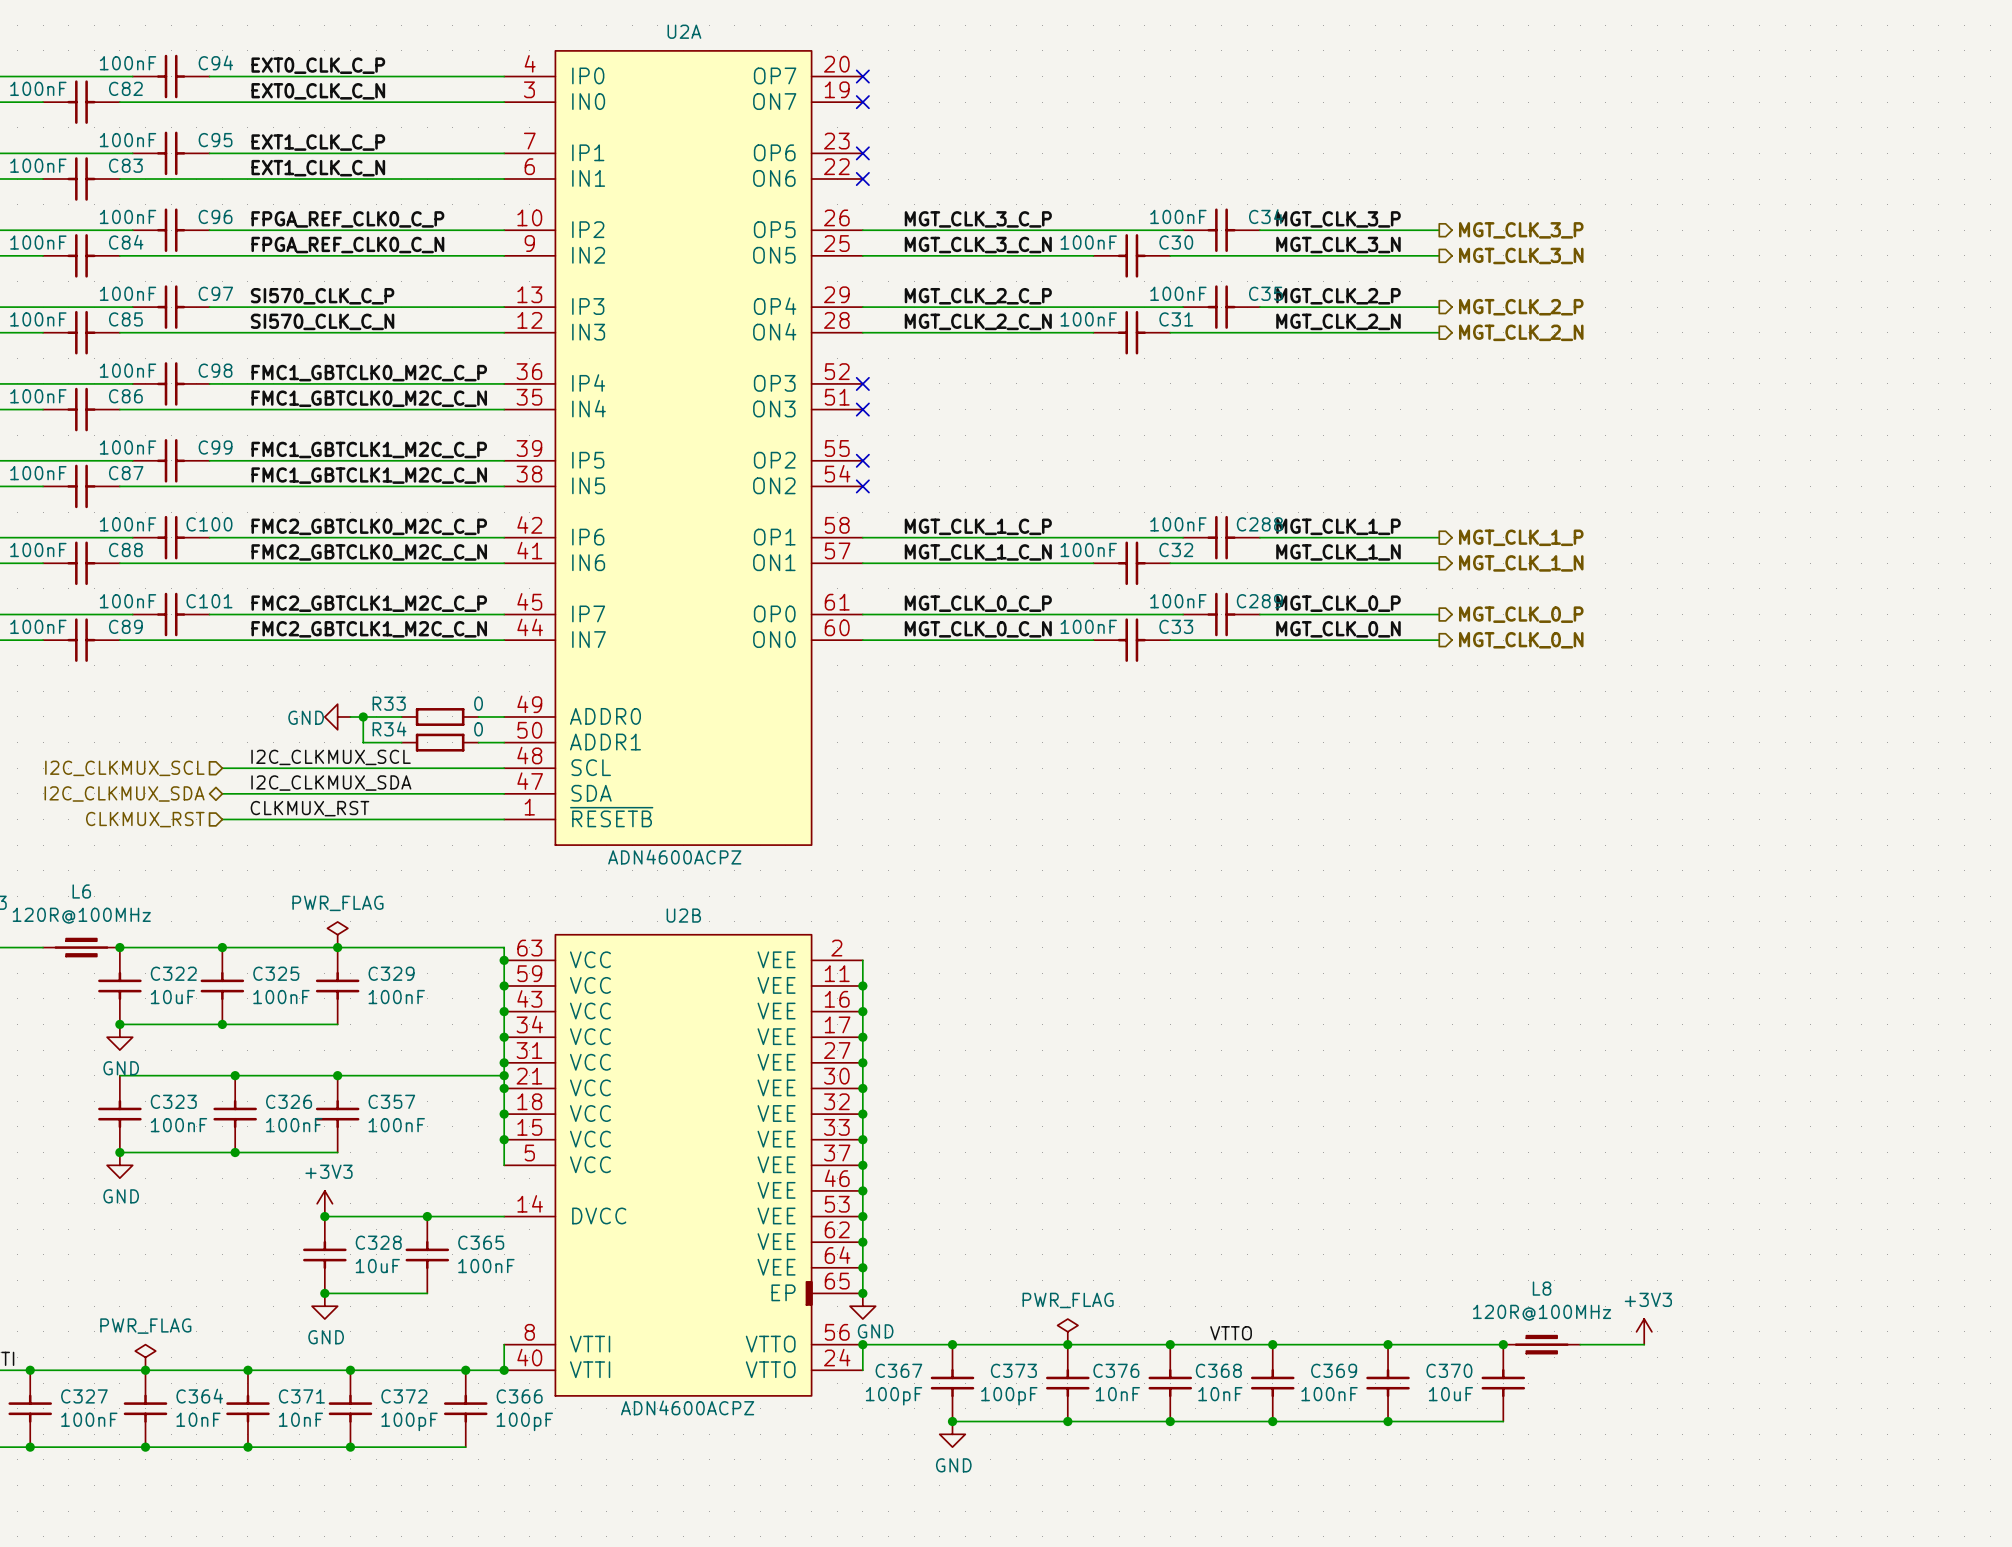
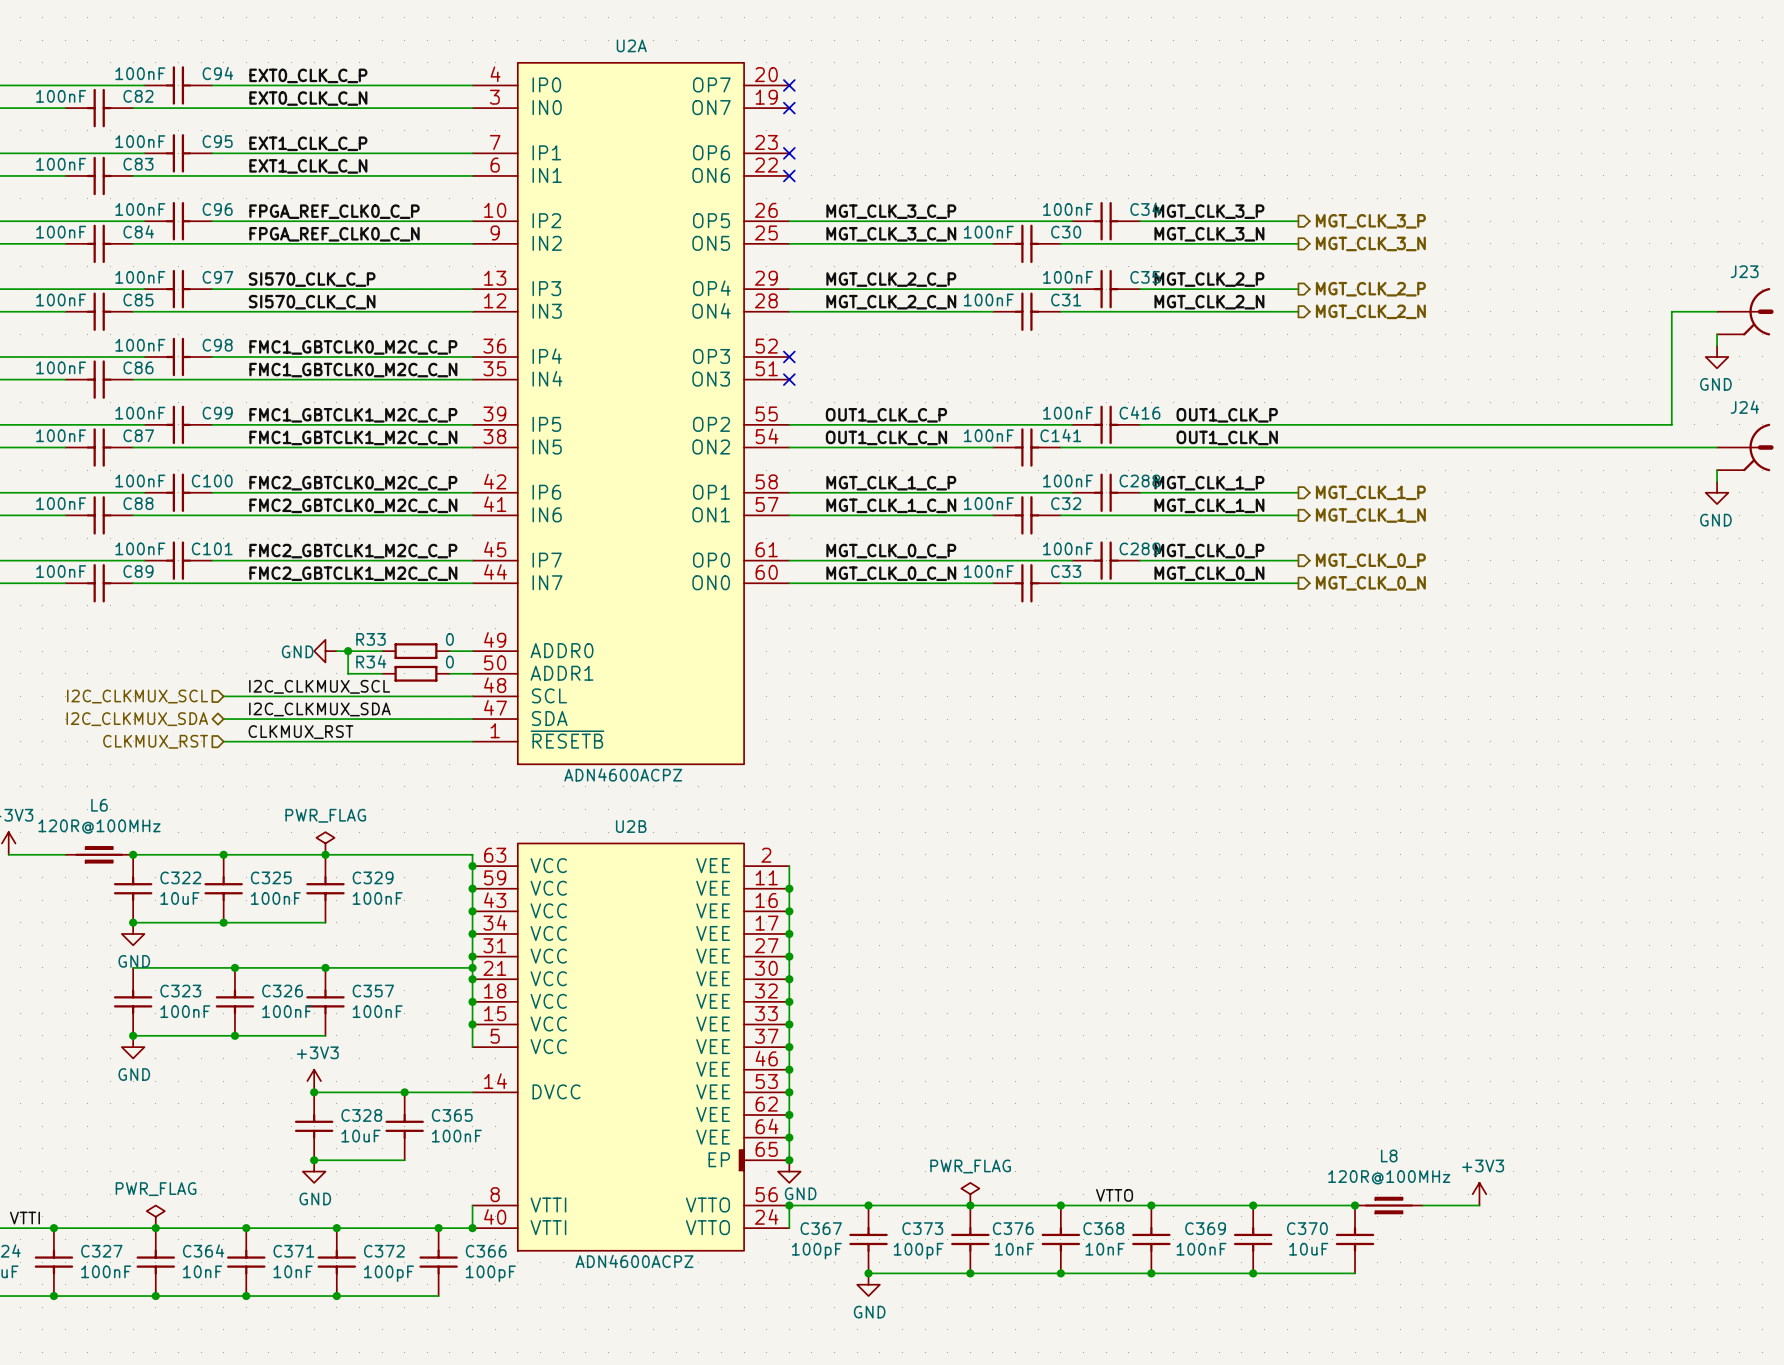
wire: none -> (1717, 311) (1671, 311) (1671, 424) (1140, 424)
J23: none -> (1745, 311)
wire: none -> (1717, 334) (1717, 345)
power symbol: none -> GND (1717, 356)
label: none -> OUT1_CLK_C_P (886, 415)
label: none -> OUT1_CLK_P (1227, 415)
wire: none -> (789, 424) (1072, 424)
no-connect mark: (862, 460) -> none
C416: none -> (1106, 424)
label: none -> OUT1_CLK_C_N (886, 437)
label: none -> OUT1_CLK_N (1227, 437)
wire: none -> (789, 447) (992, 447)
no-connect mark: (862, 486) -> none
C141: none -> (1026, 447)
wire: none -> (1060, 447) (1717, 447)
J24: none -> (1745, 447)
wire: none -> (1717, 470) (1717, 481)
power symbol: none -> GND (1717, 492)

